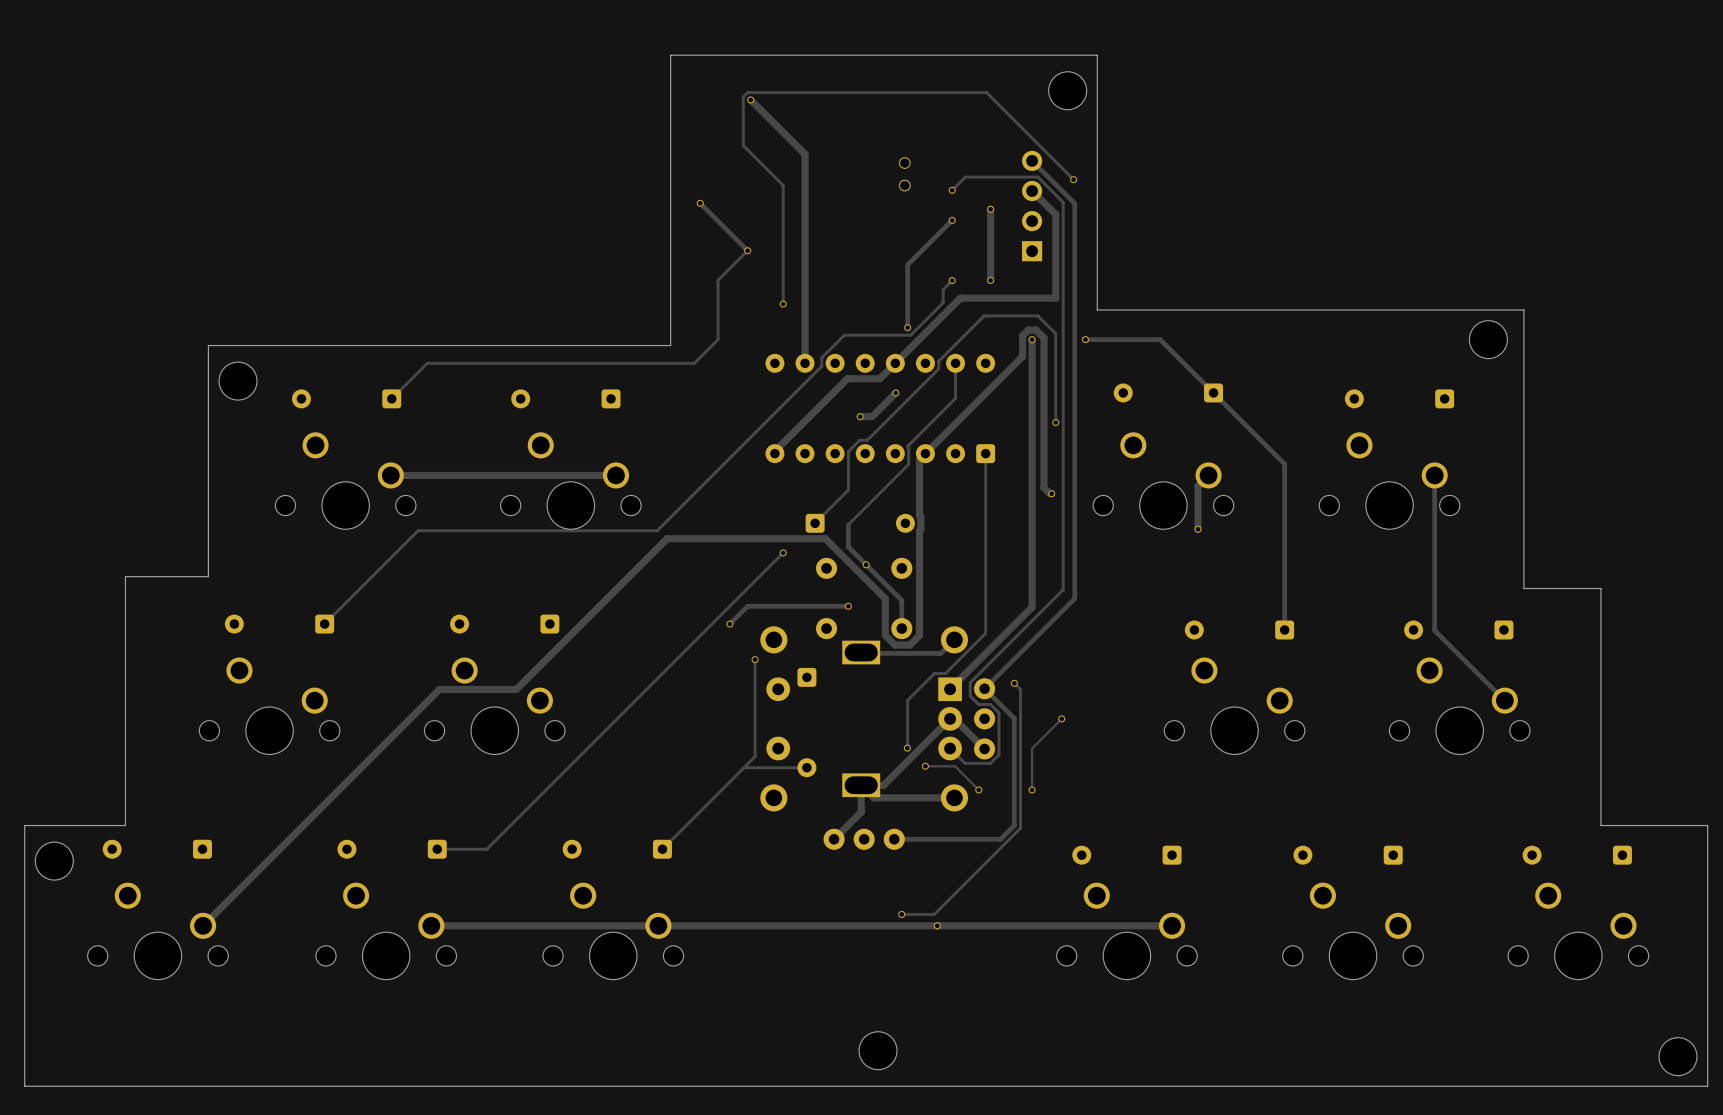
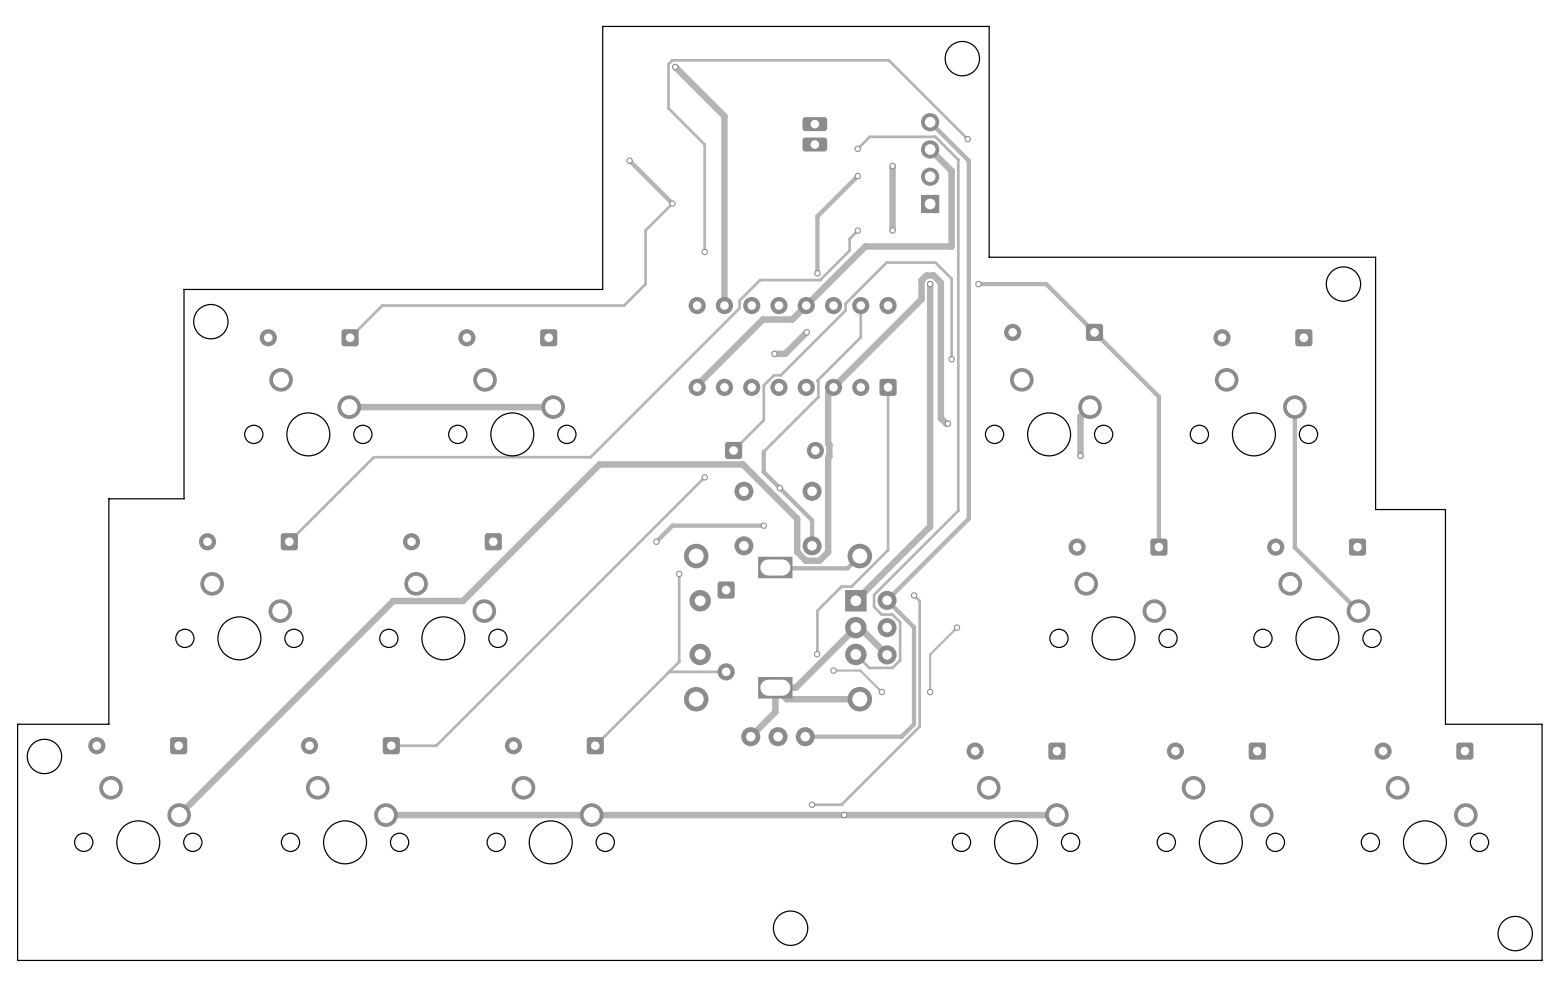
part: none -> (814, 134)

